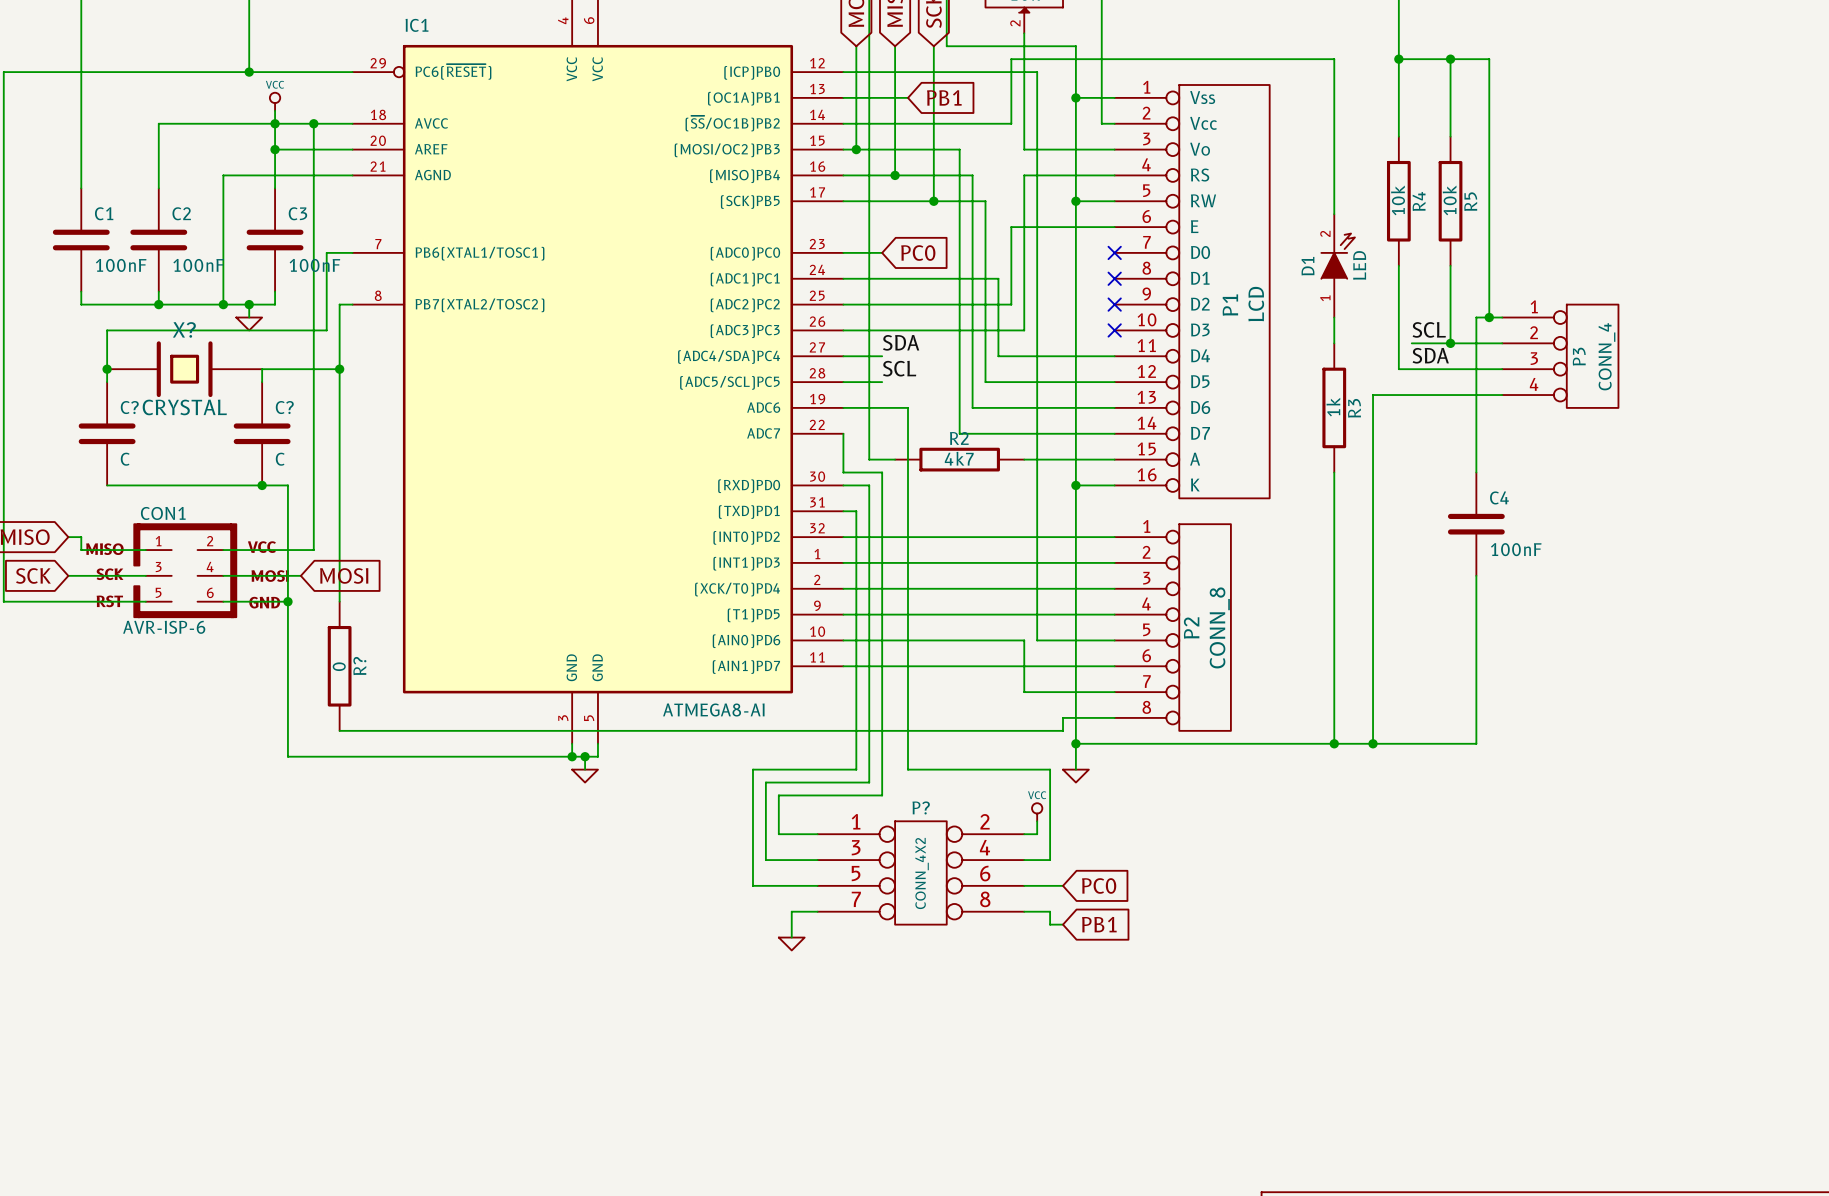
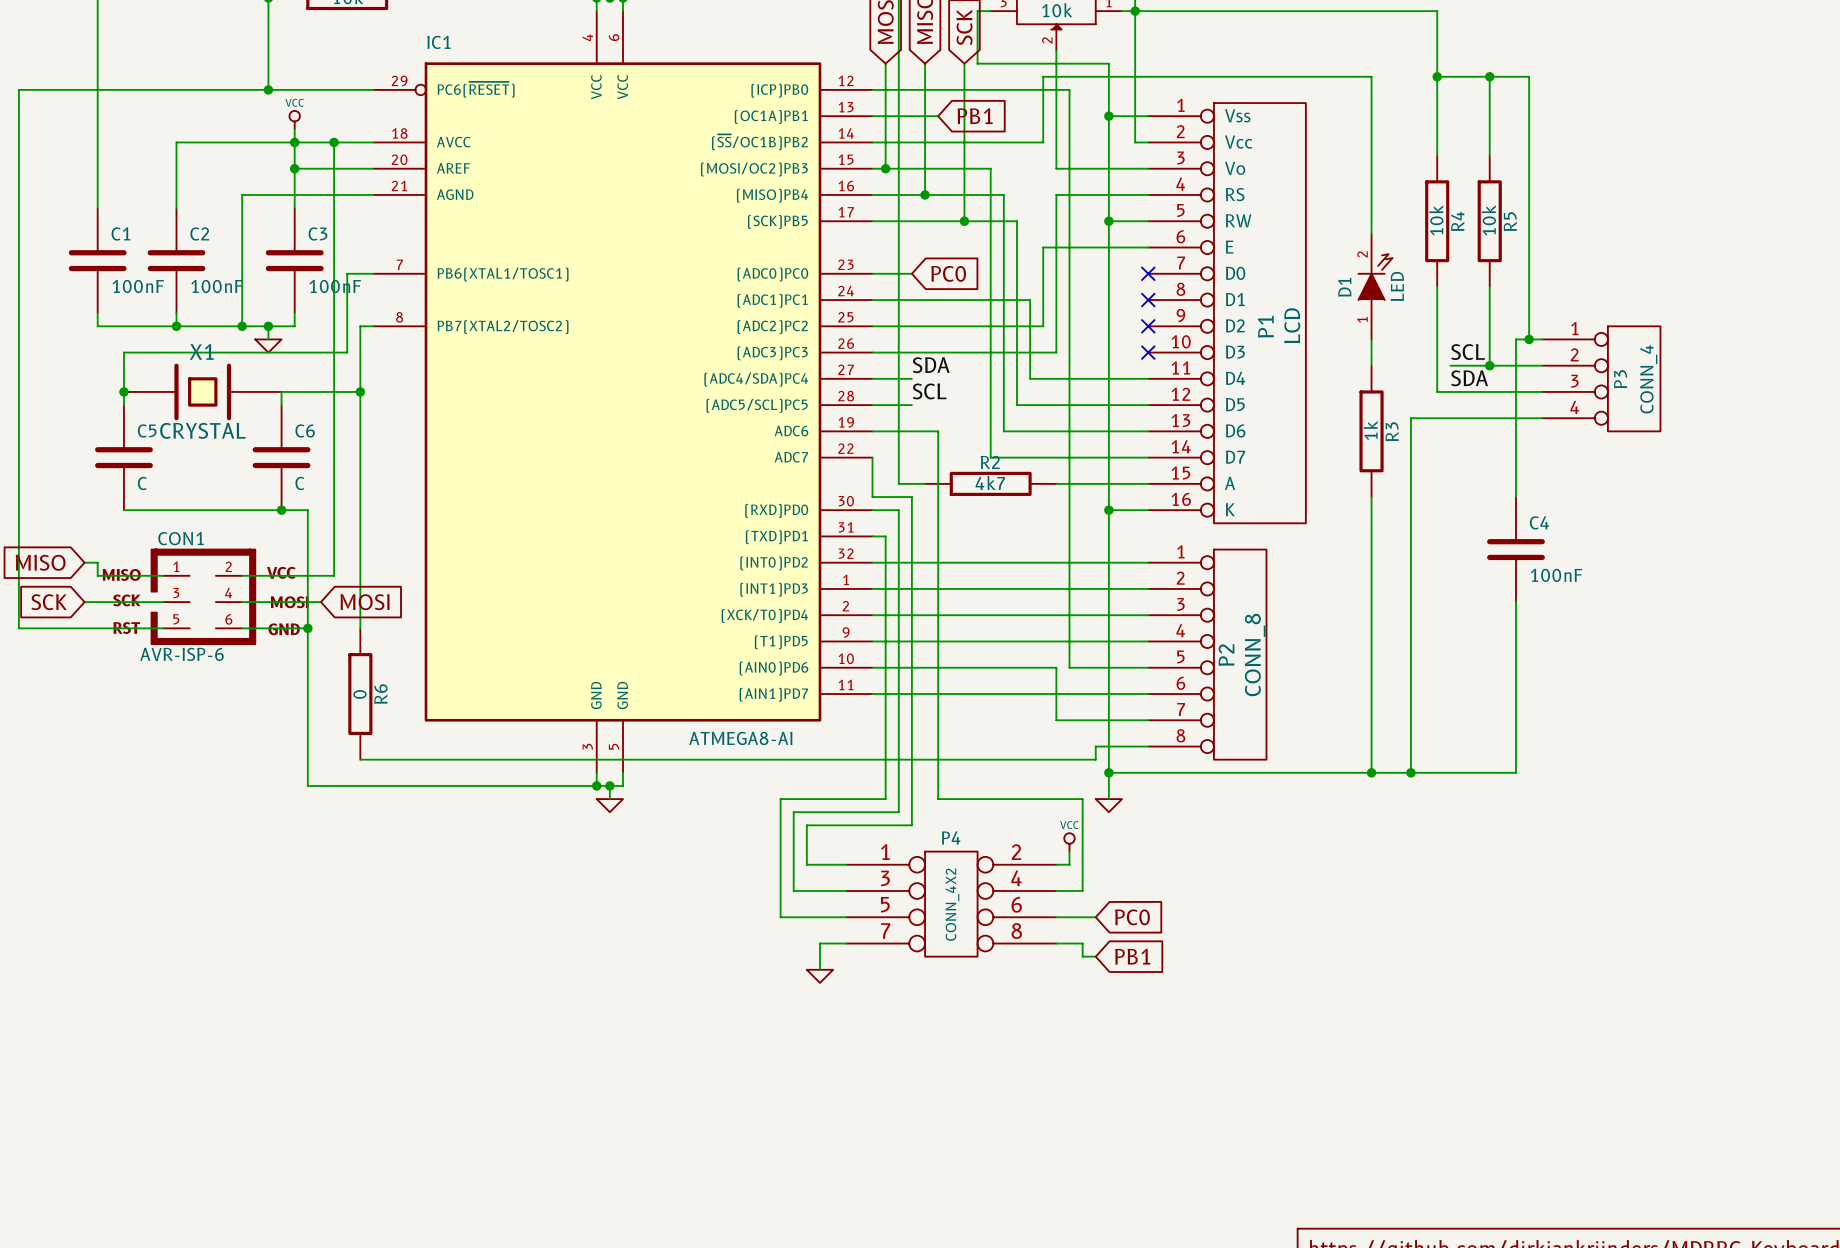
X? name: X? (184, 329) -> X1 (201, 351)
C? name: C? (129, 407) -> C5 (147, 430)
C? name: C? (284, 407) -> C6 (305, 430)
R? name: R? (359, 666) -> R6 (380, 694)
P? name: P? (921, 807) -> P4 (951, 837)

